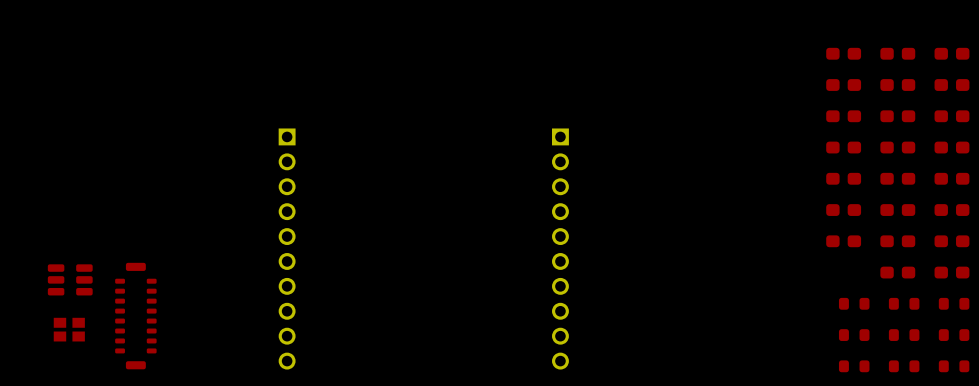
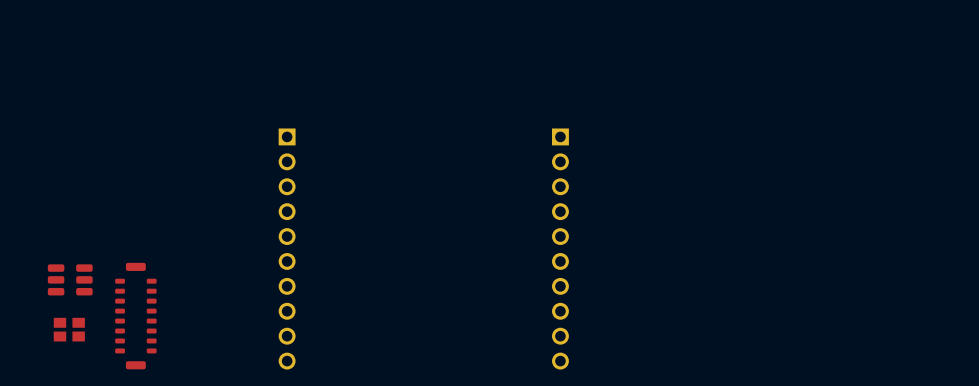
part: (843, 53) -> none
part: (897, 53) -> none
part: (951, 53) -> none
part: (843, 85) -> none
part: (897, 85) -> none
part: (951, 85) -> none
part: (843, 116) -> none
part: (897, 116) -> none
part: (951, 116) -> none
part: (843, 147) -> none
part: (897, 147) -> none
part: (951, 147) -> none
part: (843, 178) -> none
part: (897, 178) -> none
part: (951, 178) -> none
part: (843, 210) -> none
part: (897, 210) -> none
part: (951, 210) -> none
part: (843, 241) -> none
part: (897, 241) -> none
part: (951, 241) -> none
part: (897, 272) -> none
part: (951, 272) -> none
part: (854, 303) -> none
part: (904, 303) -> none
part: (954, 303) -> none
part: (854, 335) -> none
part: (904, 335) -> none
part: (954, 335) -> none
part: (854, 366) -> none
part: (904, 366) -> none
part: (954, 366) -> none

